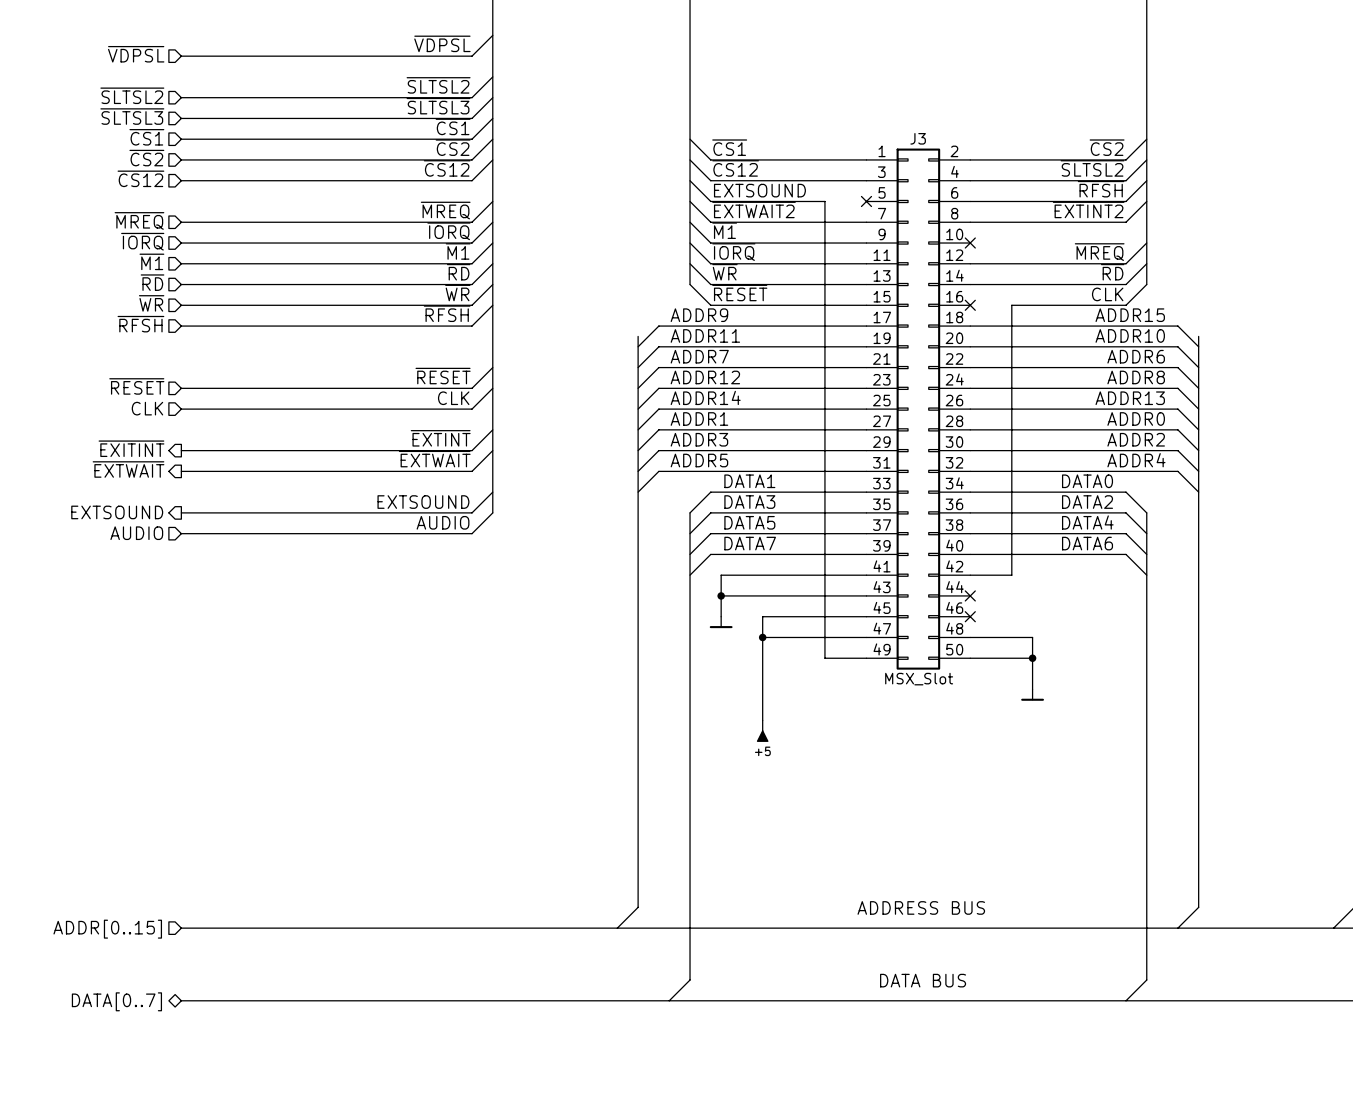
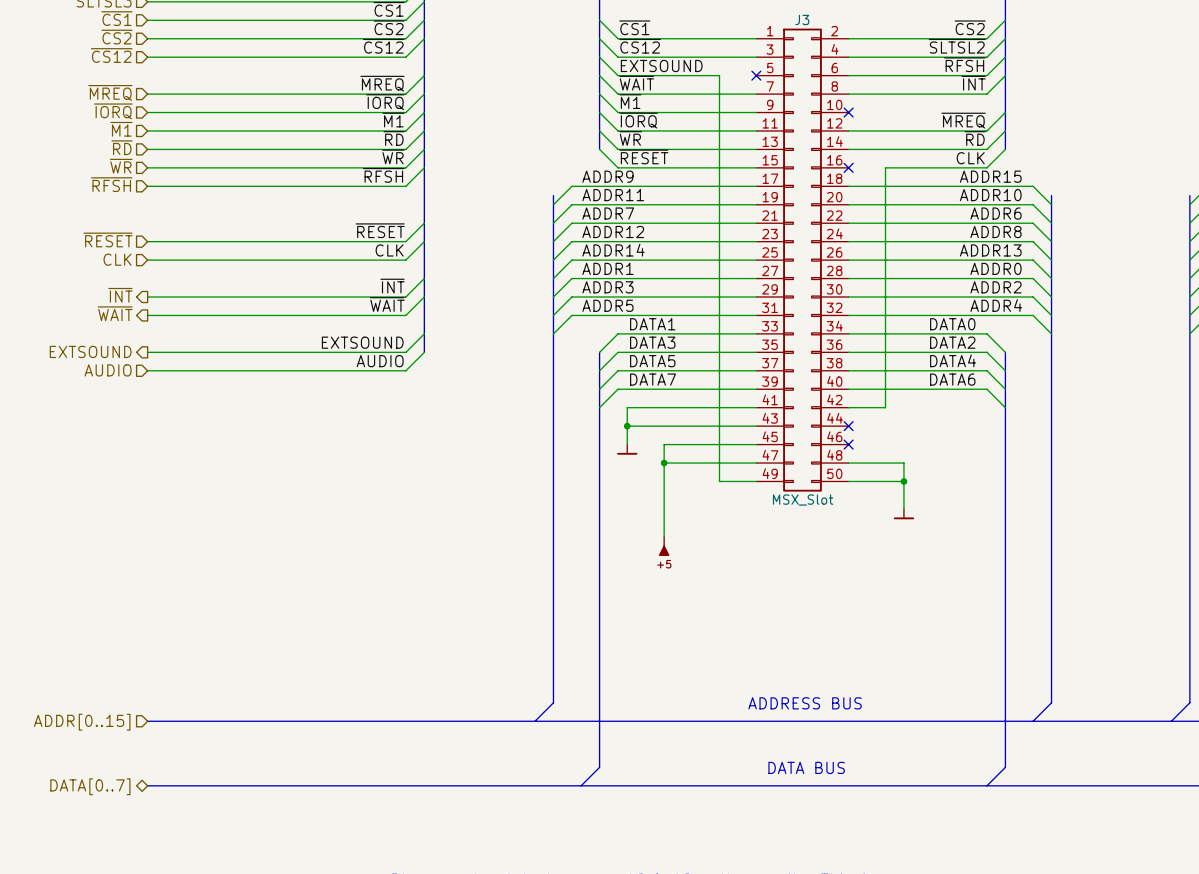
label: ~{EXTWAIT2} (754, 209) -> ~{WAIT} (636, 83)
label: ~{EXTINT2} (1088, 209) -> ~{INT} (973, 83)
label: ~{EXTINT} (440, 438) -> ~{INT} (392, 286)
hierarchical label: ~{EXITINT} (131, 448) -> ~{INT} (120, 295)
label: ~{EXTWAIT} (434, 459) -> ~{WAIT} (387, 304)
hierarchical label: ~{EXTWAIT} (128, 469) -> ~{WAIT} (115, 313)

